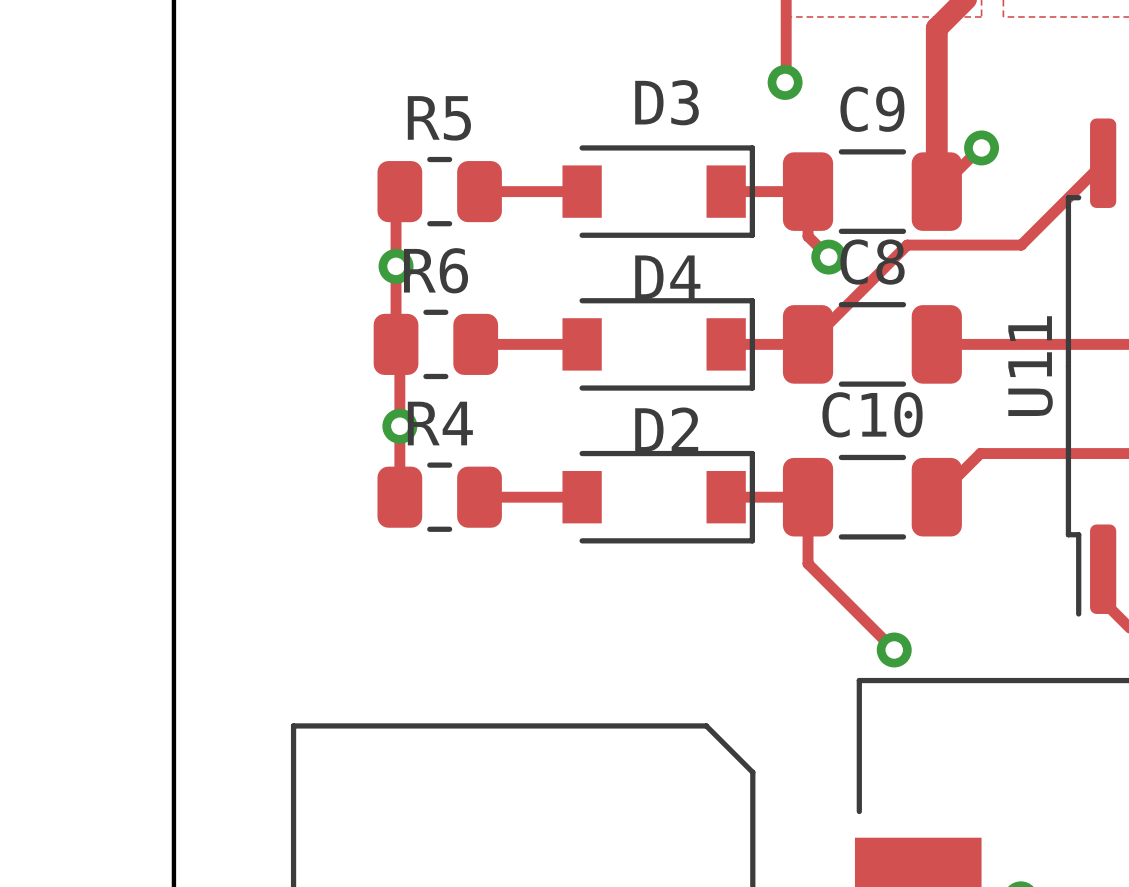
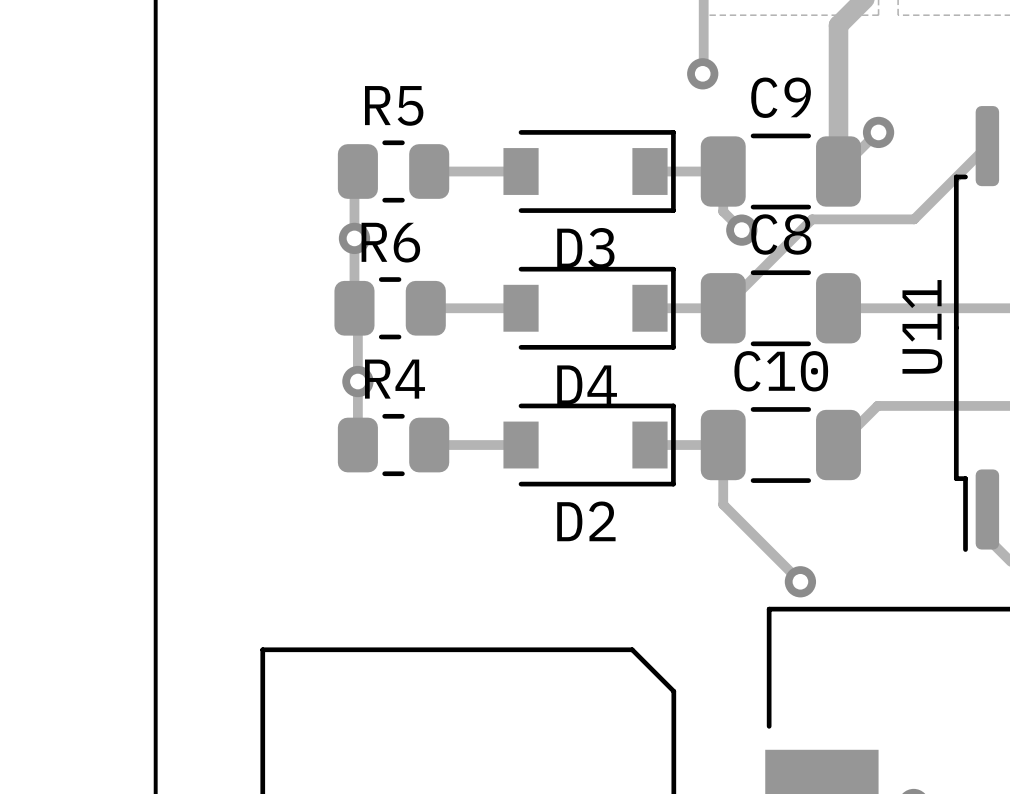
D3 name position: D3 (666, 102) -> D3 (585, 248)
D4 name position: D4 (667, 277) -> D4 (587, 384)
D2 name position: D2 (666, 429) -> D2 (586, 521)

